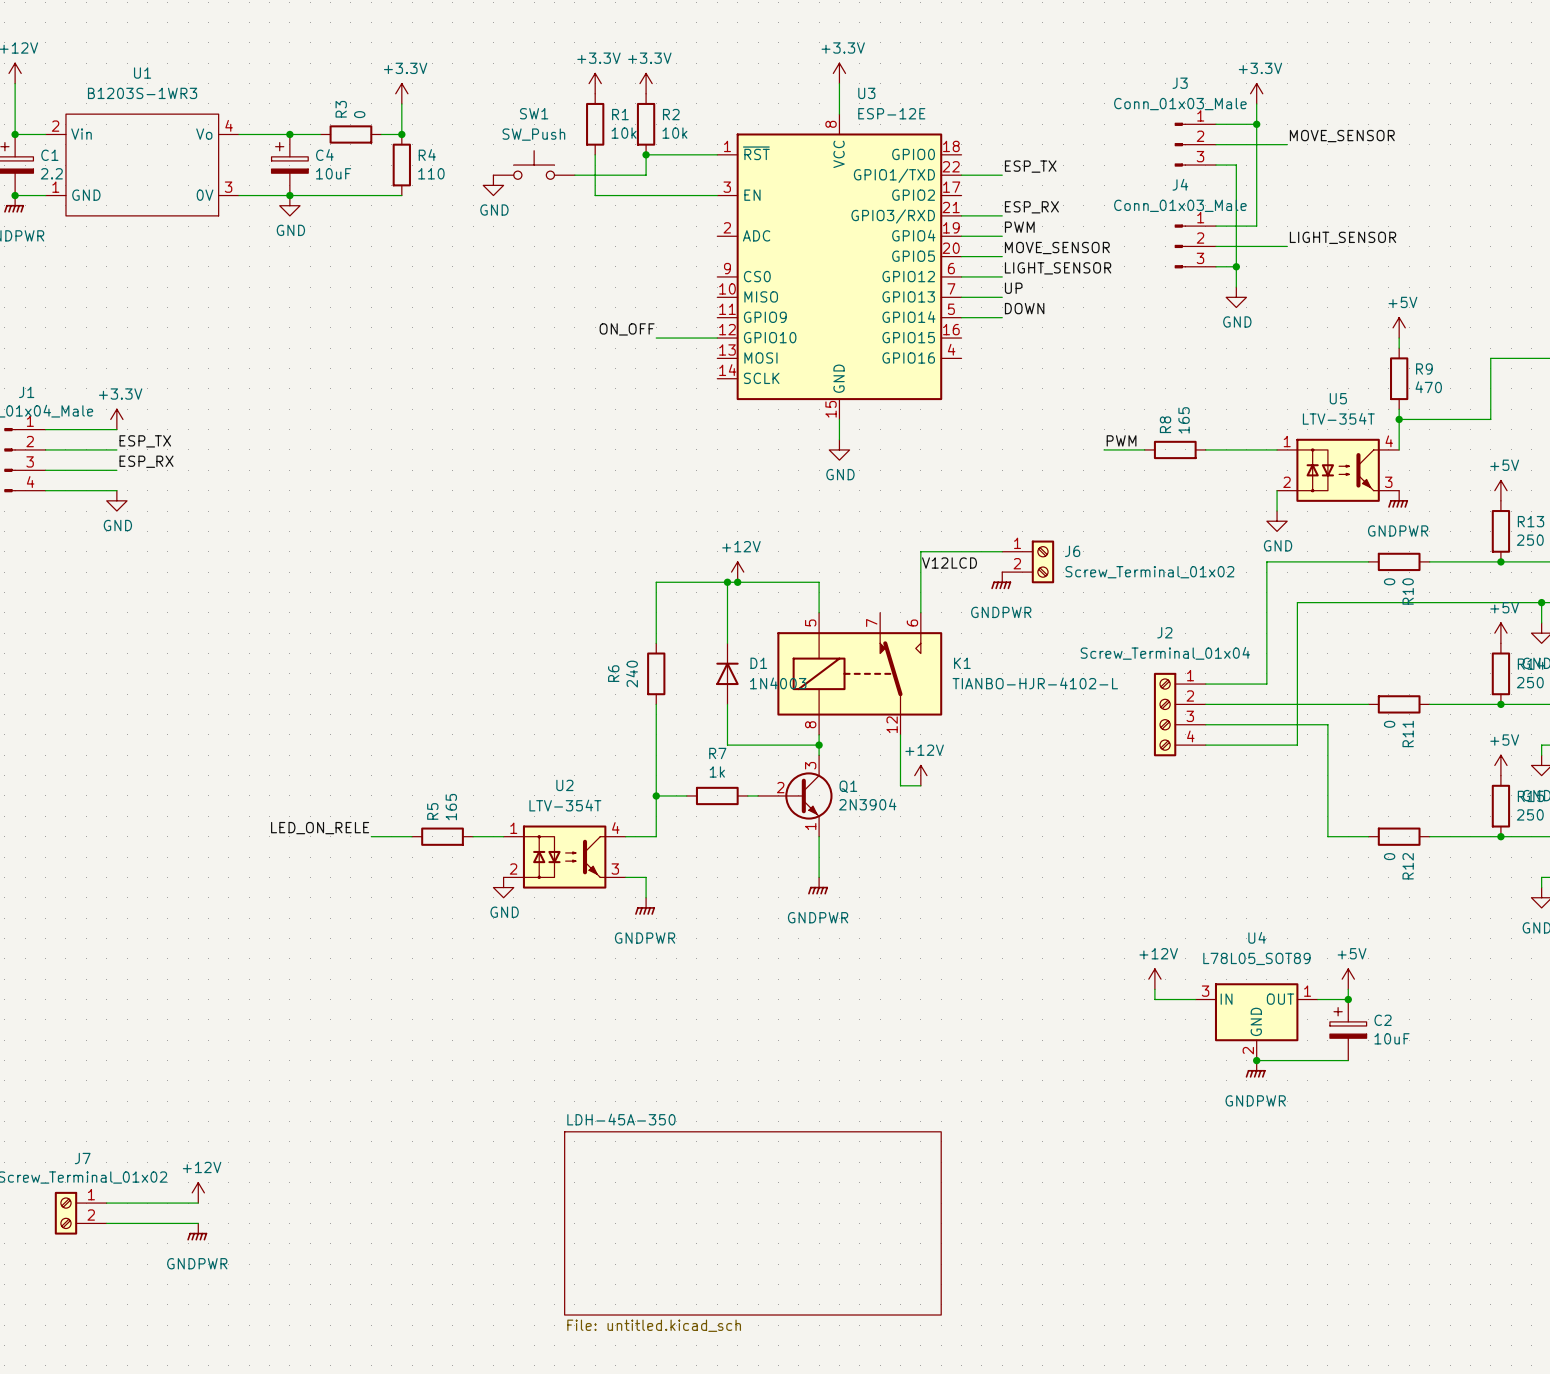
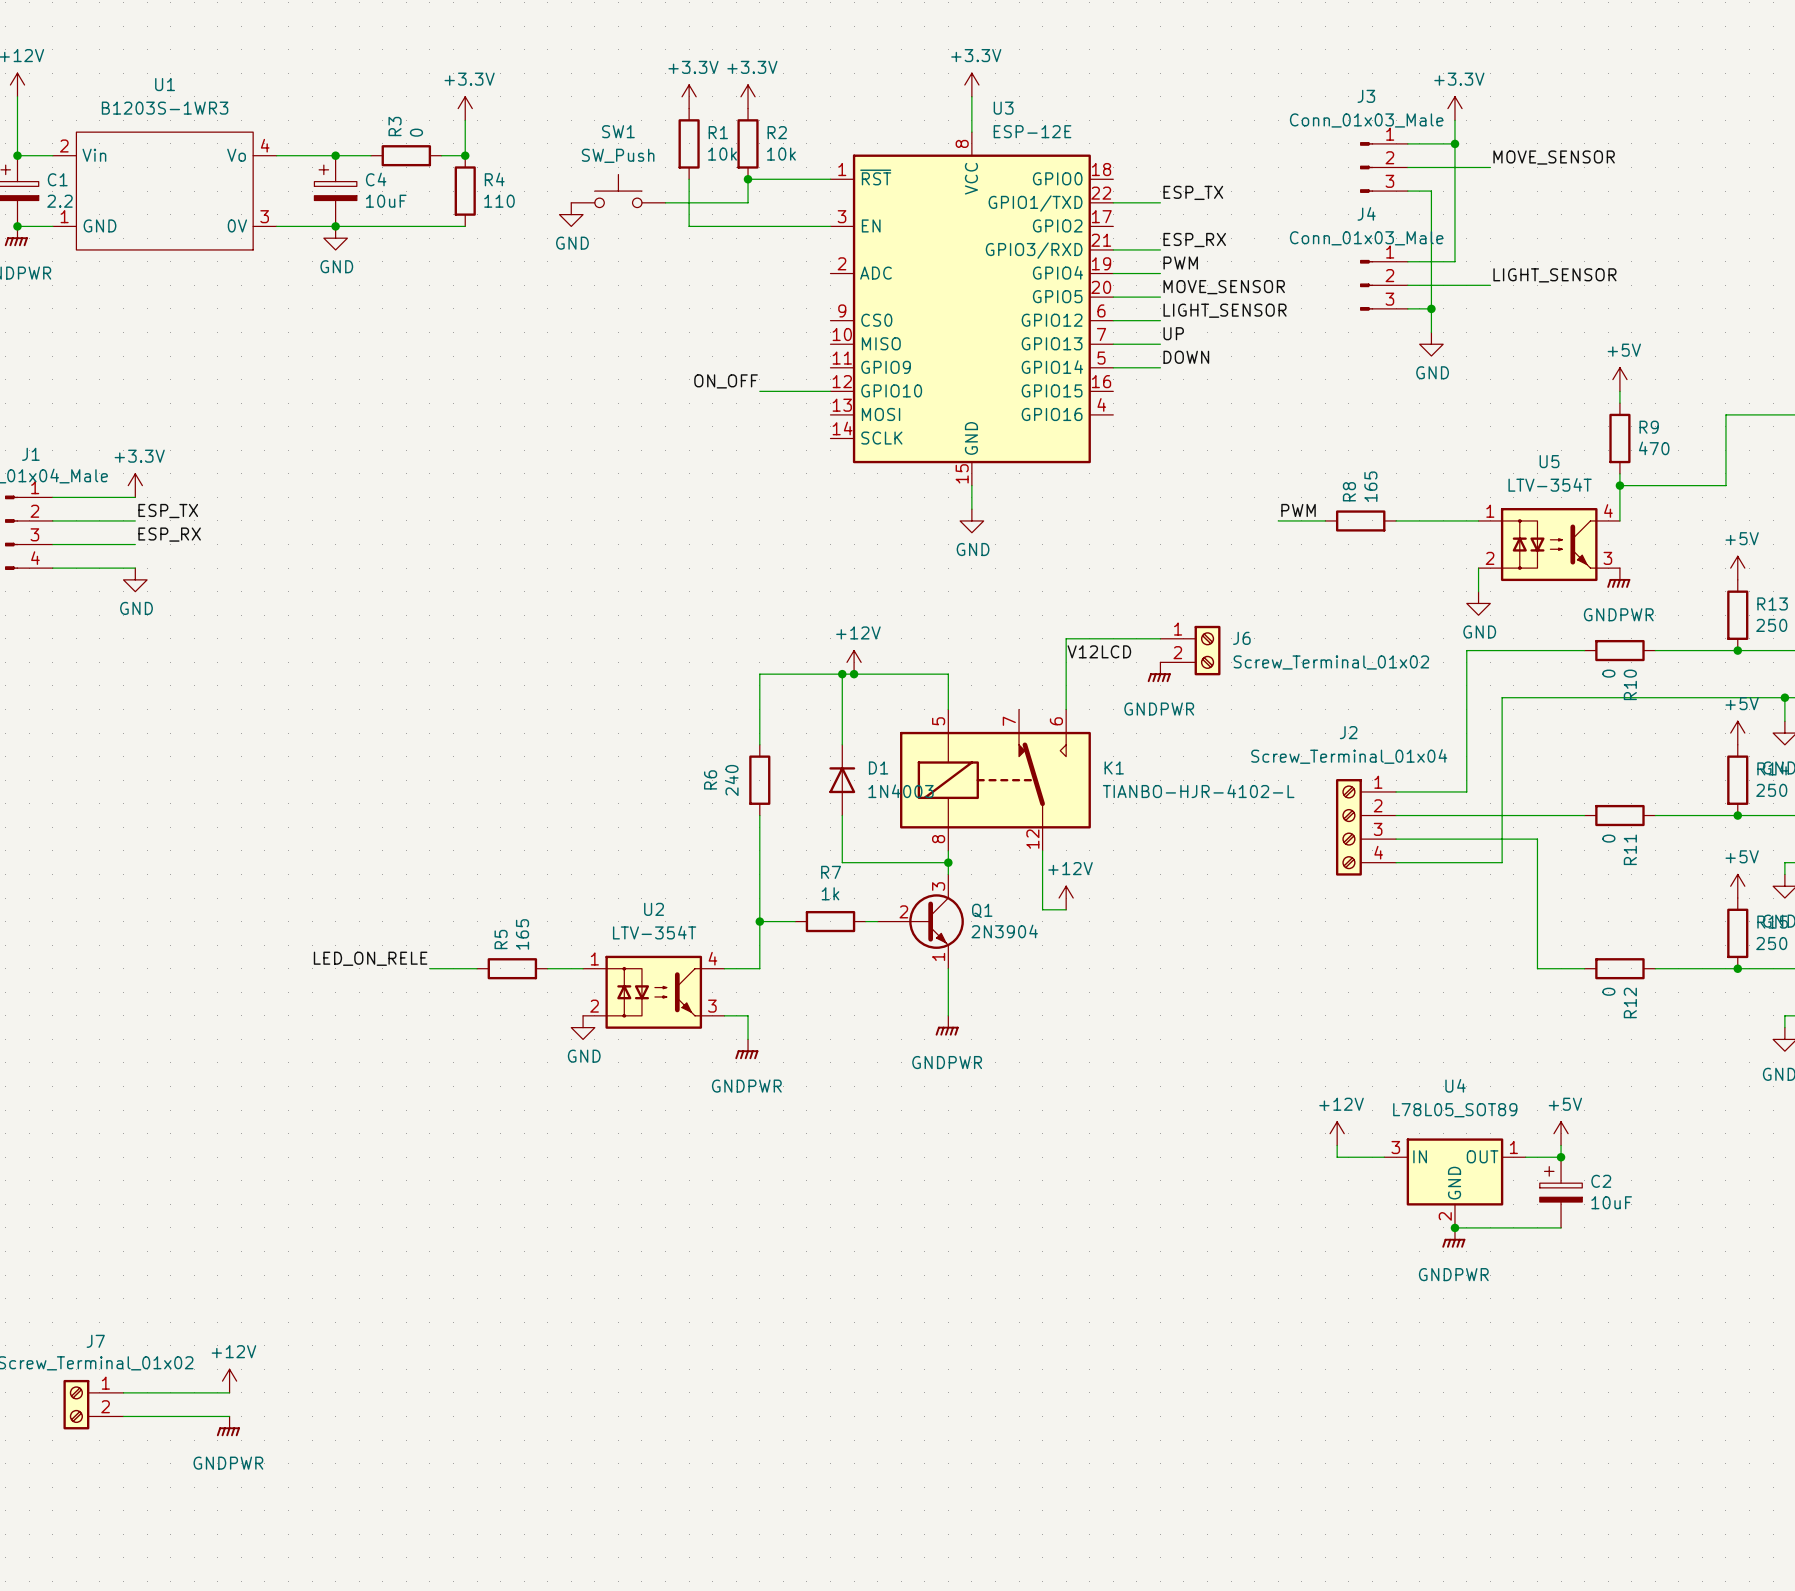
sheet LDH-45A-350: File: untitled.kicad_sch (752, 1223) -> none

